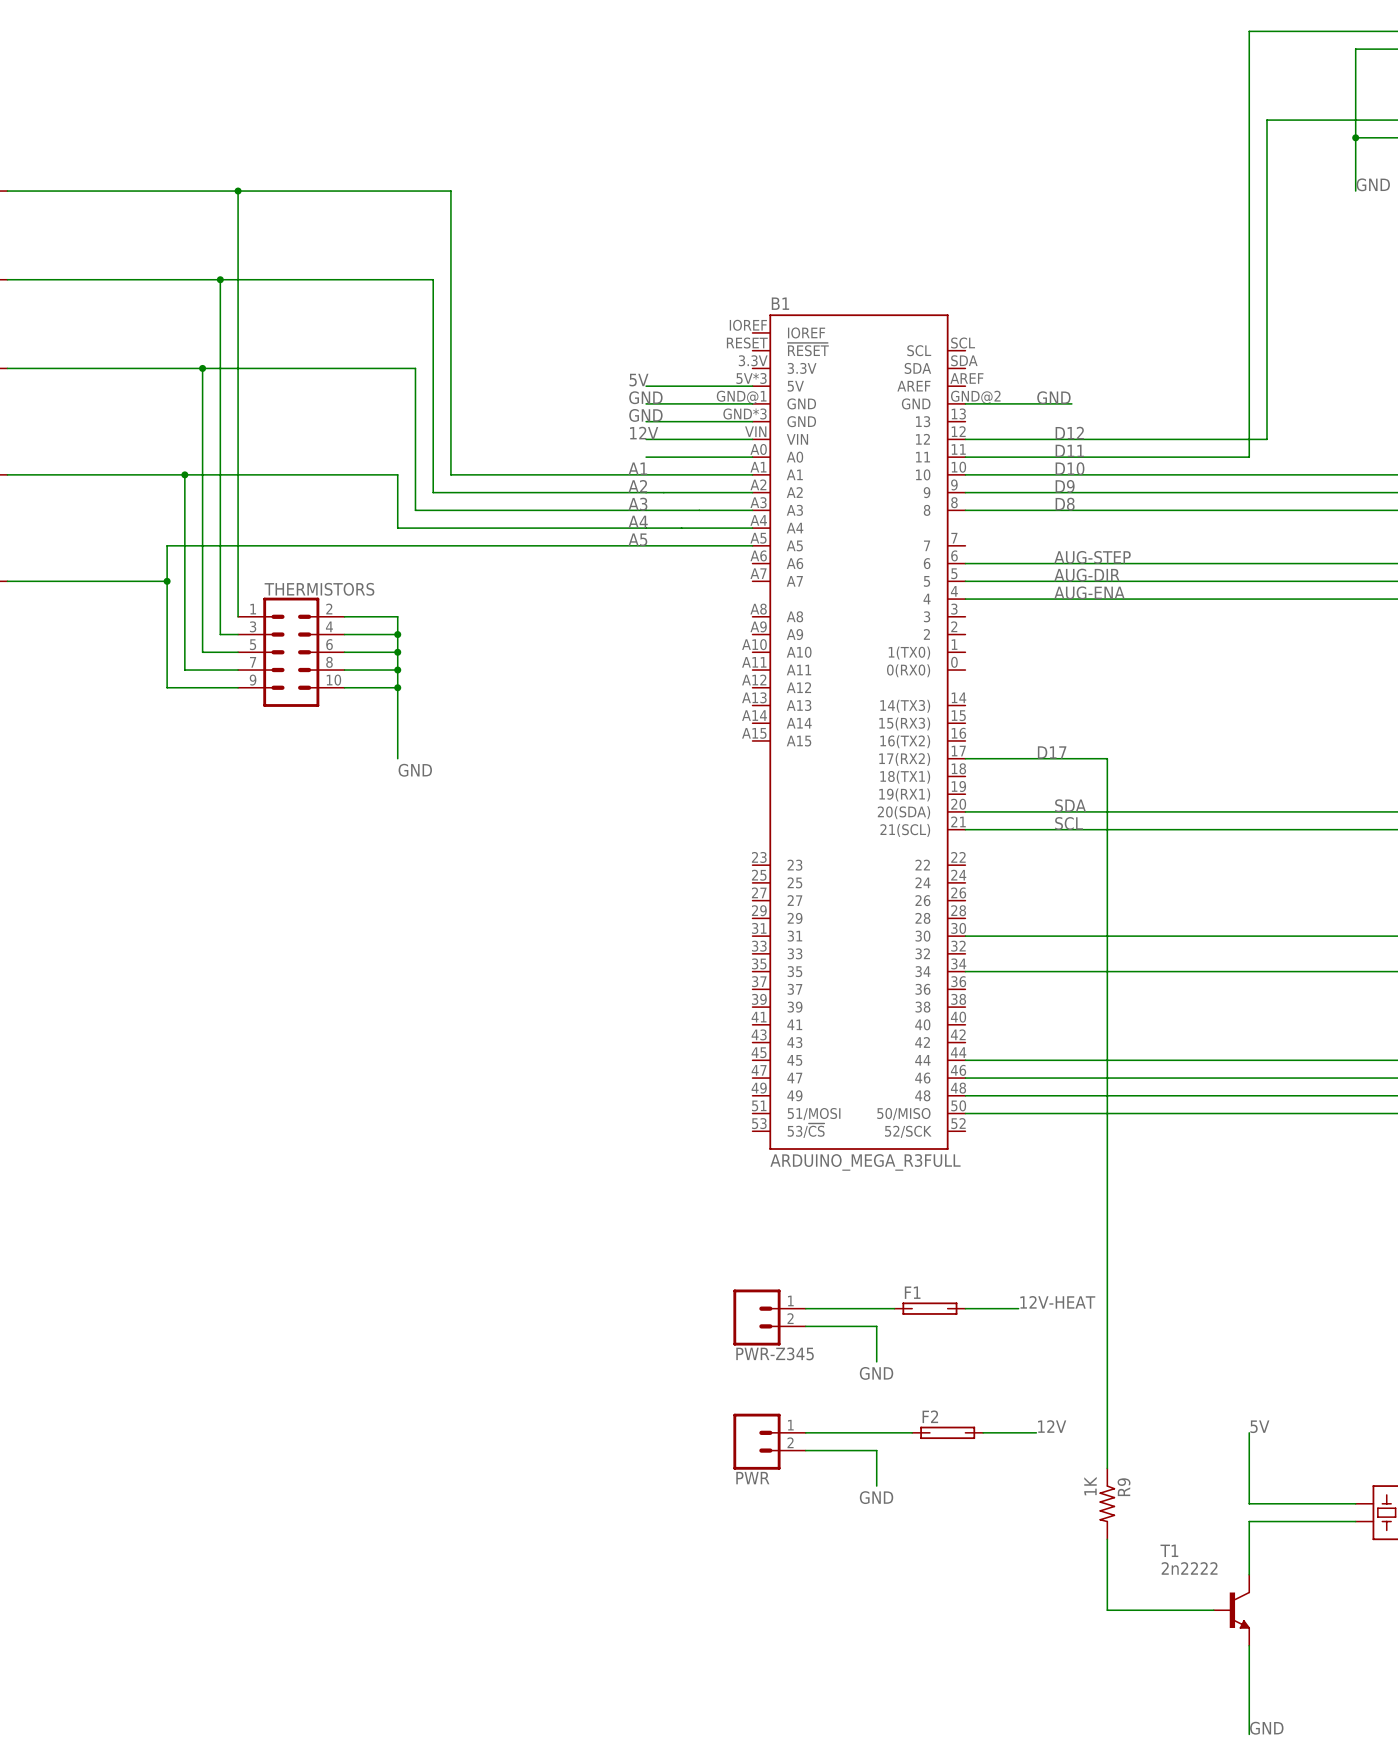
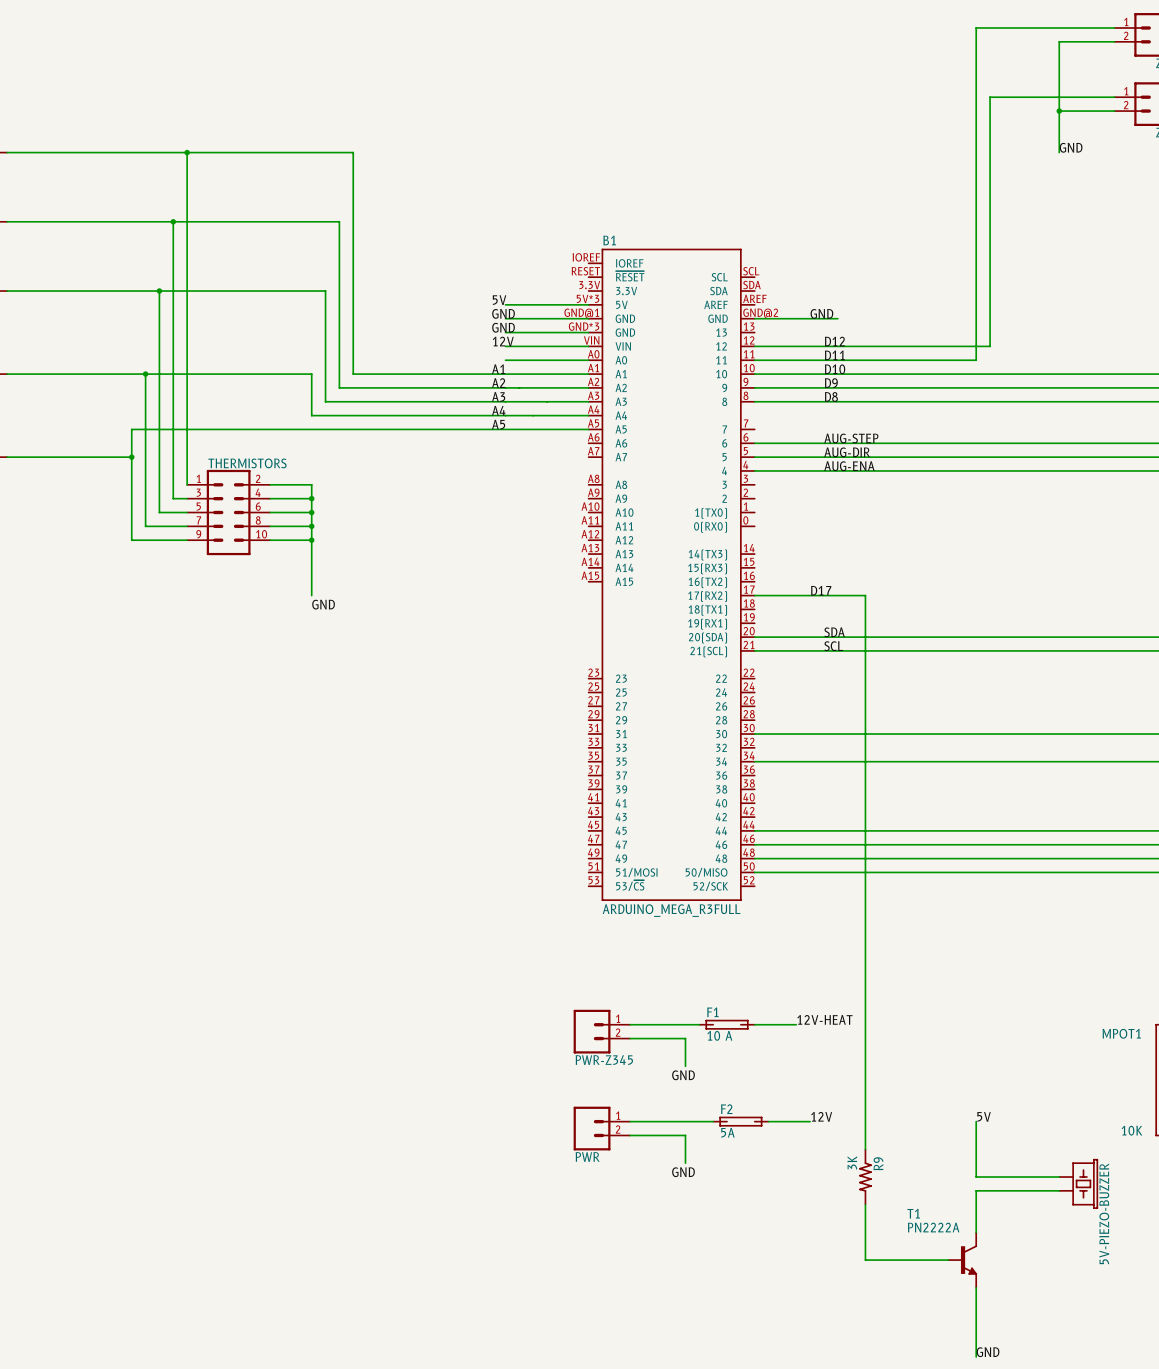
F1 value: none -> 10 A (719, 1035)
F2 value: none -> 5A (727, 1132)
R9 value: 1K (1090, 1486) -> 3K (852, 1162)
T1 value: 2n2222 (1189, 1568) -> PN2222A (933, 1227)

